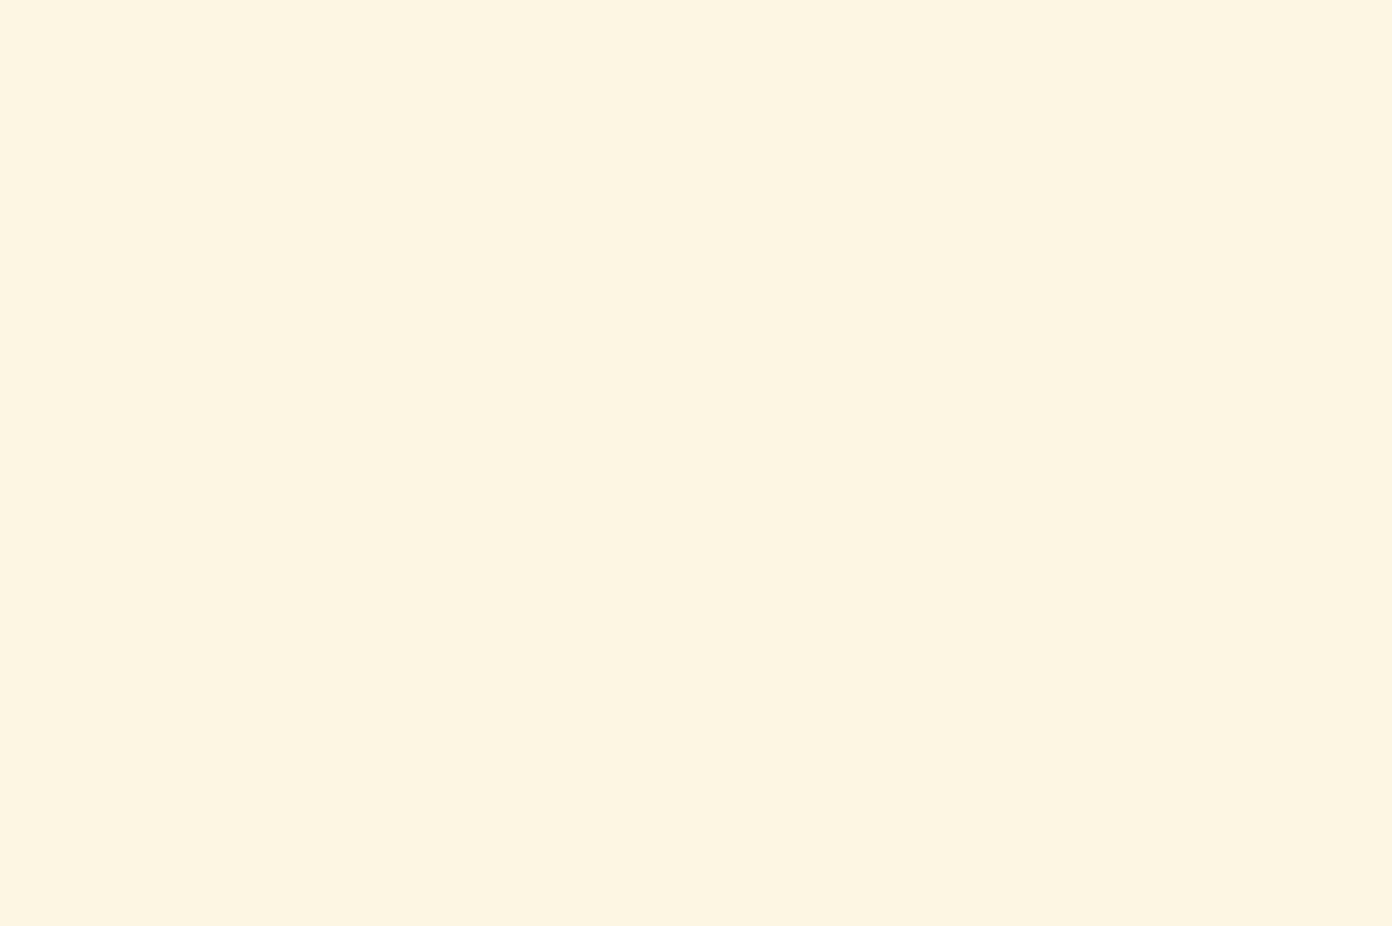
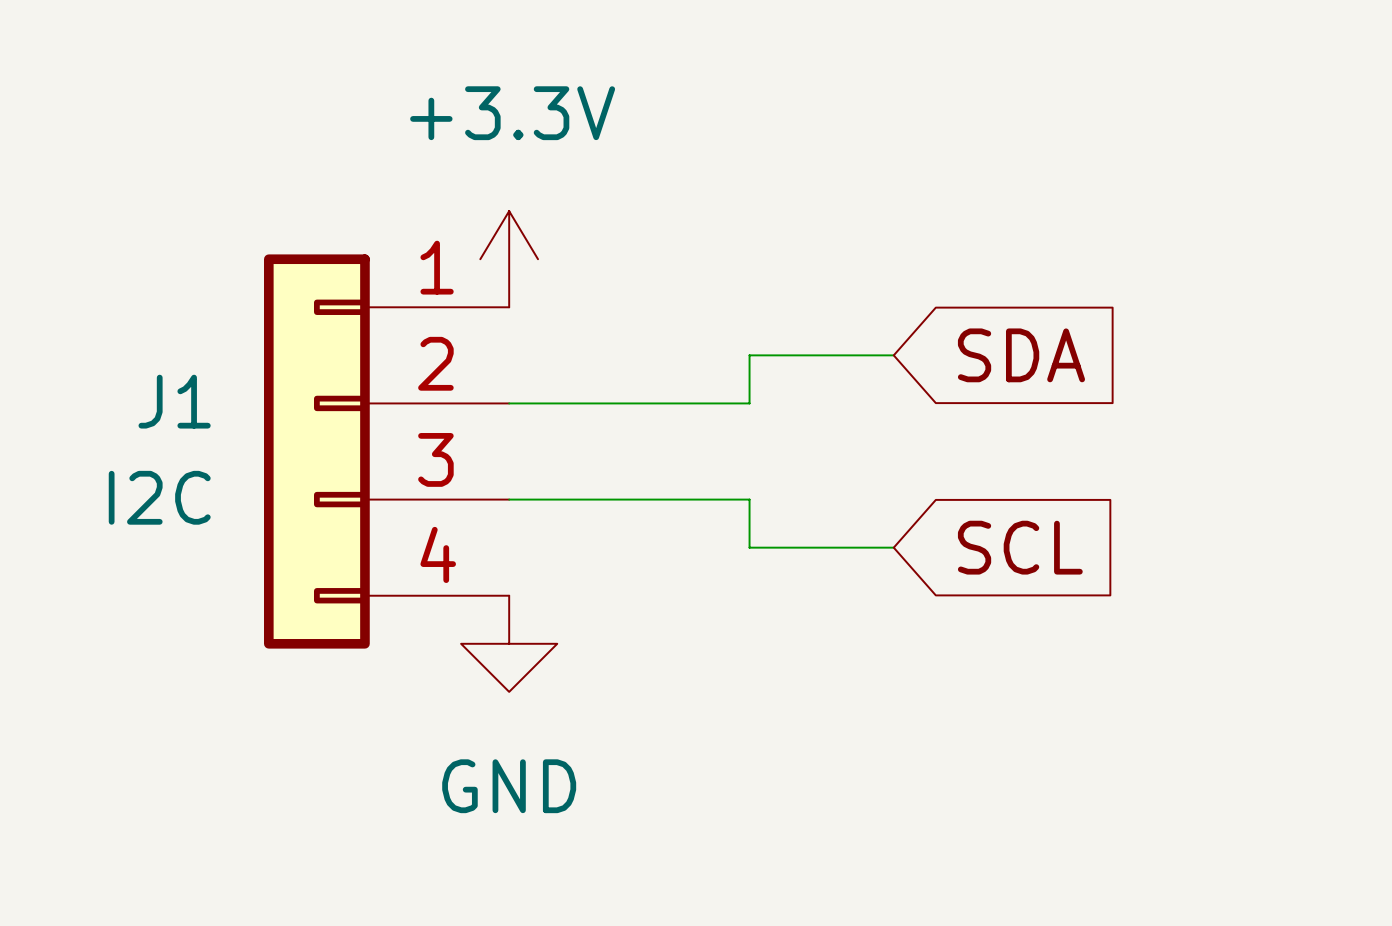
power symbol: none -> +3.3V (509, 259)
wire: none -> (893, 355) (749, 355) (749, 403) (509, 403)
global label: none -> SDA (1021, 355)
J1: none -> I2C (386, 451)
wire: none -> (509, 499) (749, 499) (749, 547) (893, 547)
global label: none -> SCL (1020, 547)
power symbol: none -> GND (509, 643)

